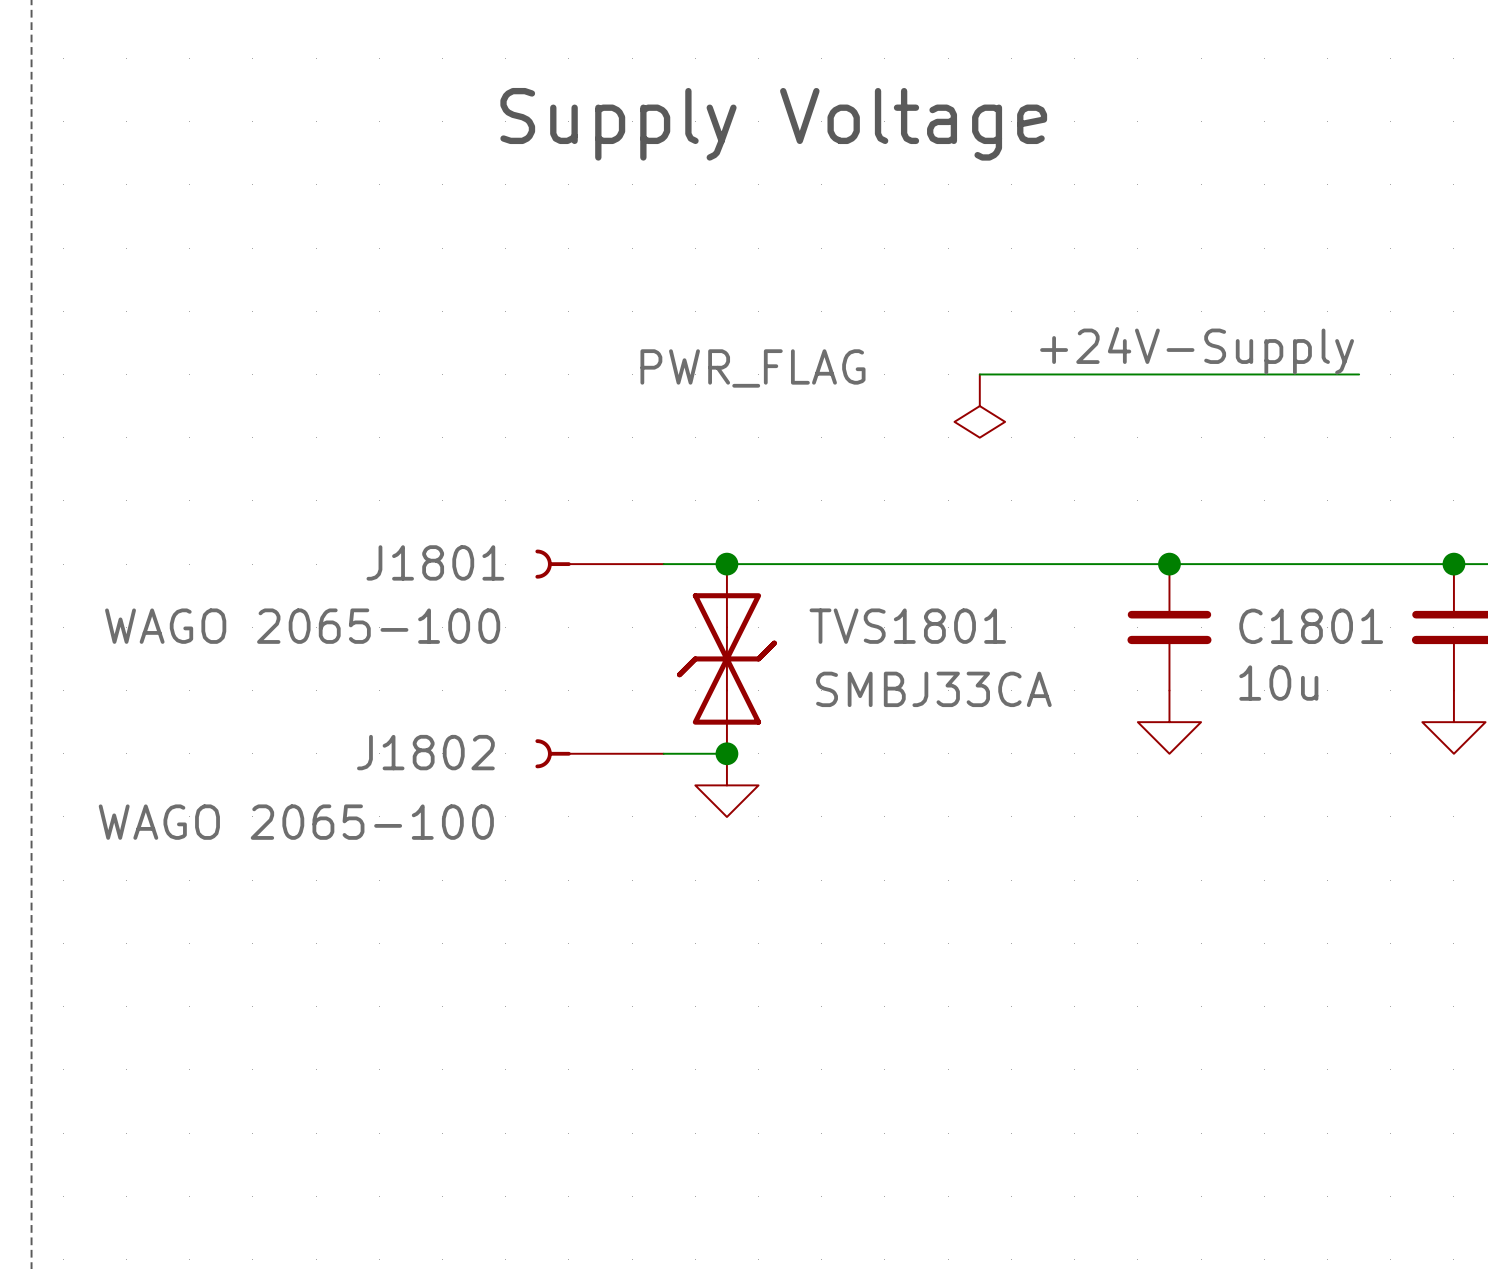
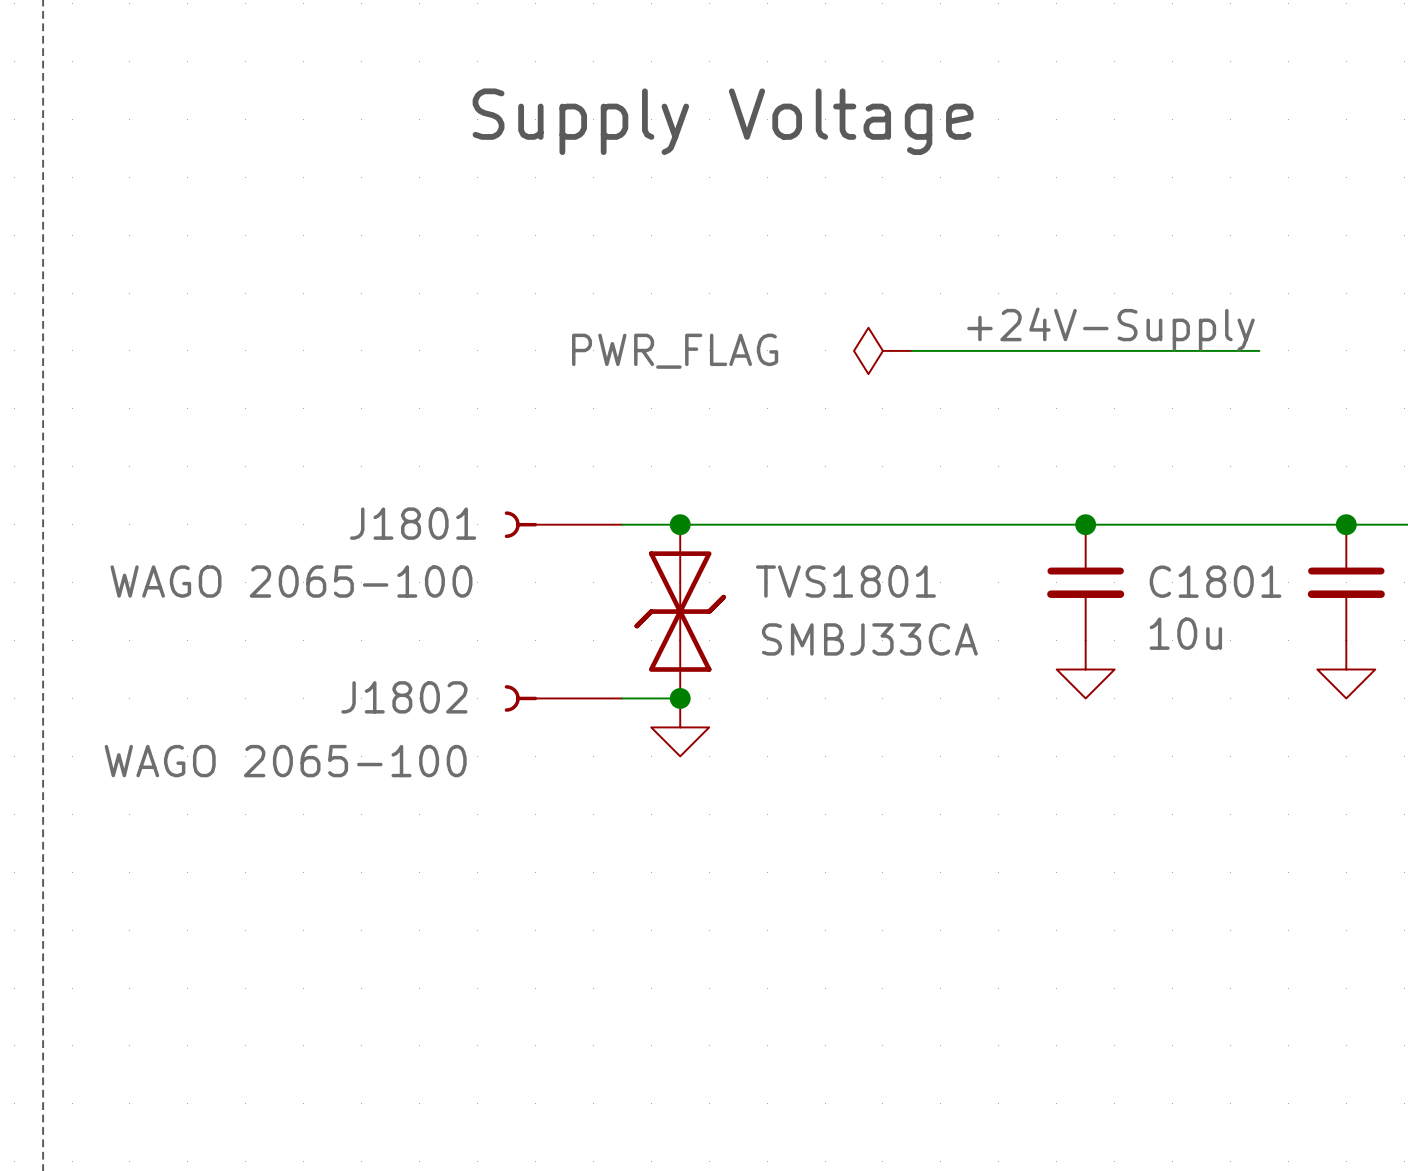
power symbol rotation: 0° (979, 406) -> 90° clockwise (882, 350)
power symbol position: PWR_FLAG (979, 406) -> PWR_FLAG (882, 350)

